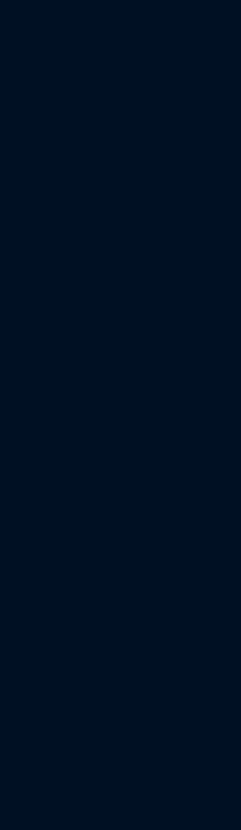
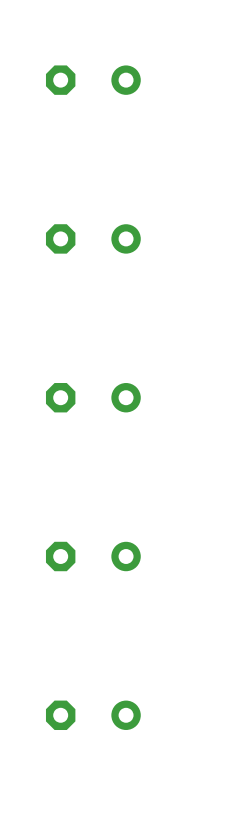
part: none -> (93, 80)
part: none -> (93, 238)
part: none -> (93, 397)
part: none -> (93, 556)
part: none -> (93, 715)

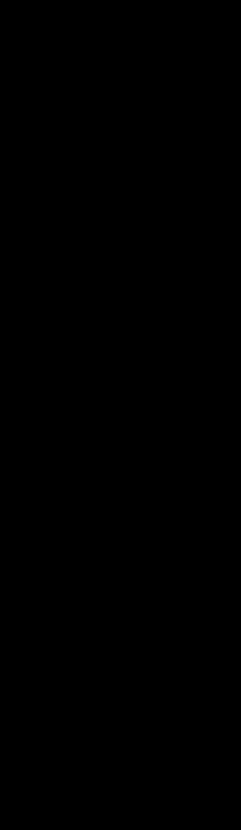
part: (93, 80) -> none
part: (93, 238) -> none
part: (93, 397) -> none
part: (93, 556) -> none
part: (93, 715) -> none

